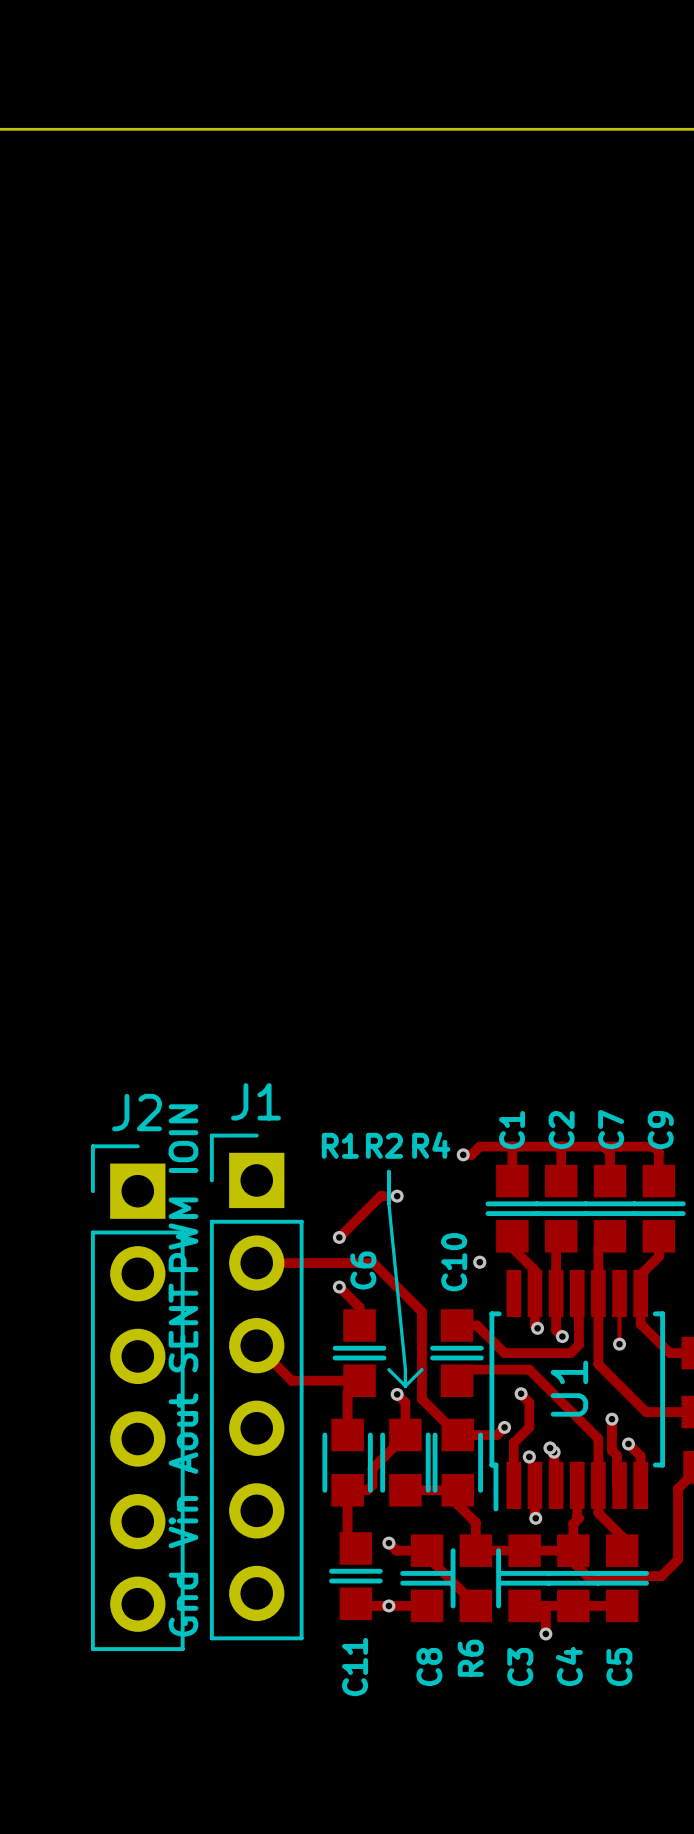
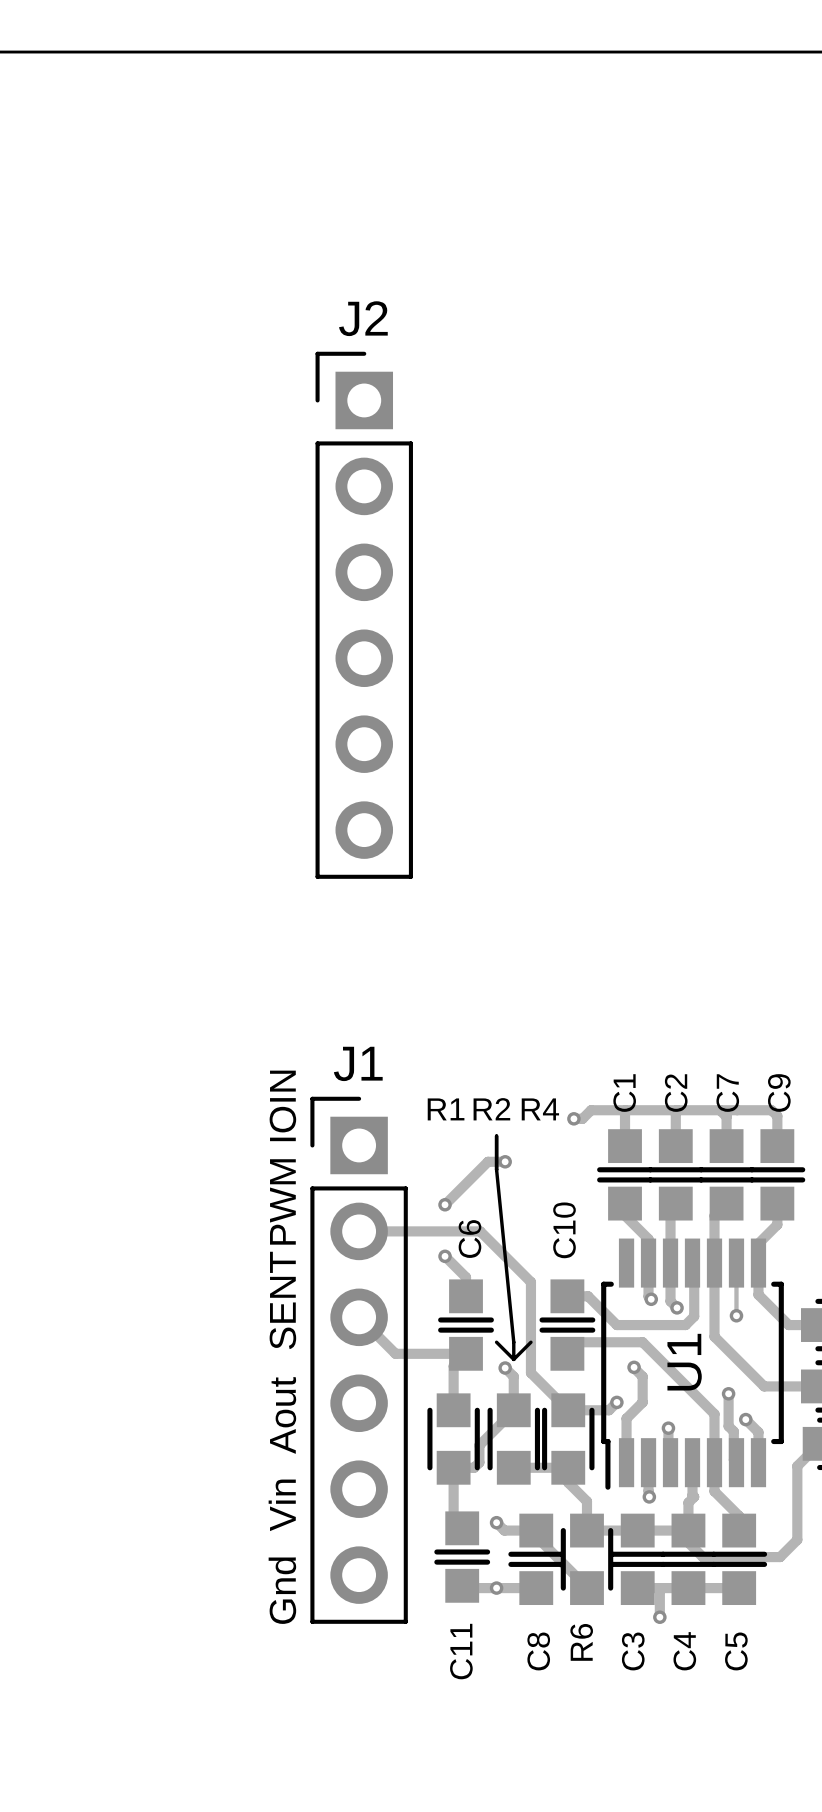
via: (479, 1262) -> none
J2 position: (137, 1397) -> (364, 615)
via: (550, 1448) -> none
via: (529, 1456) -> none

